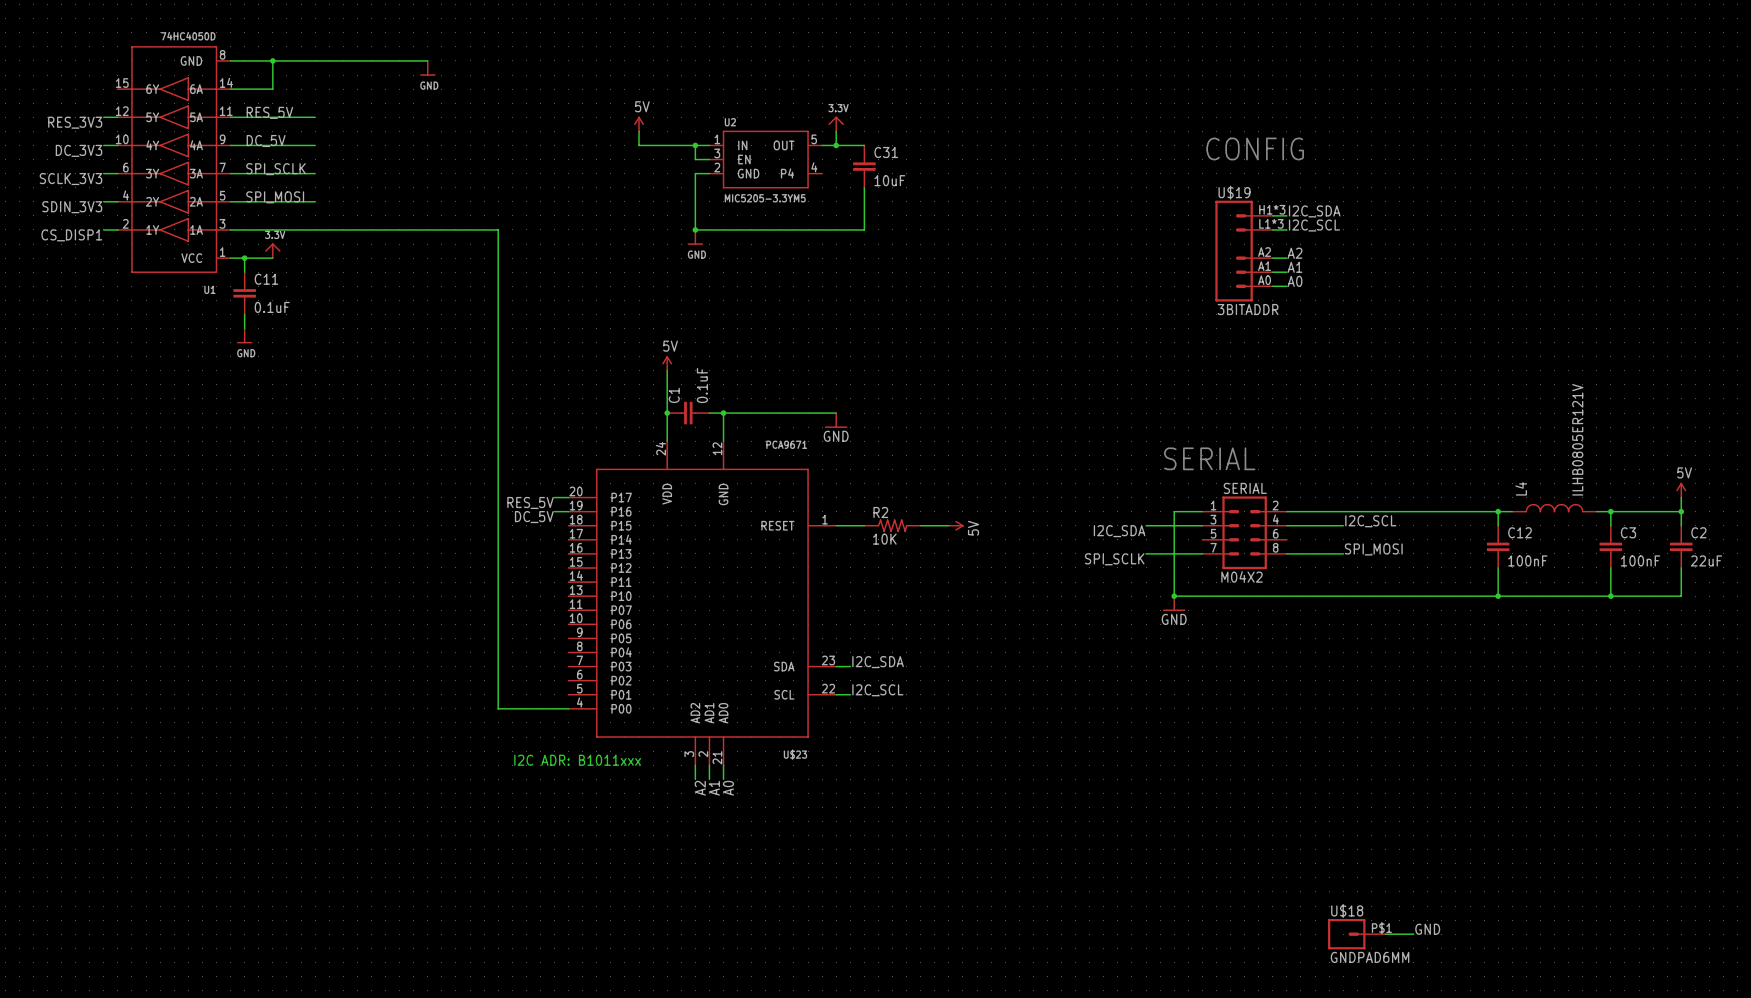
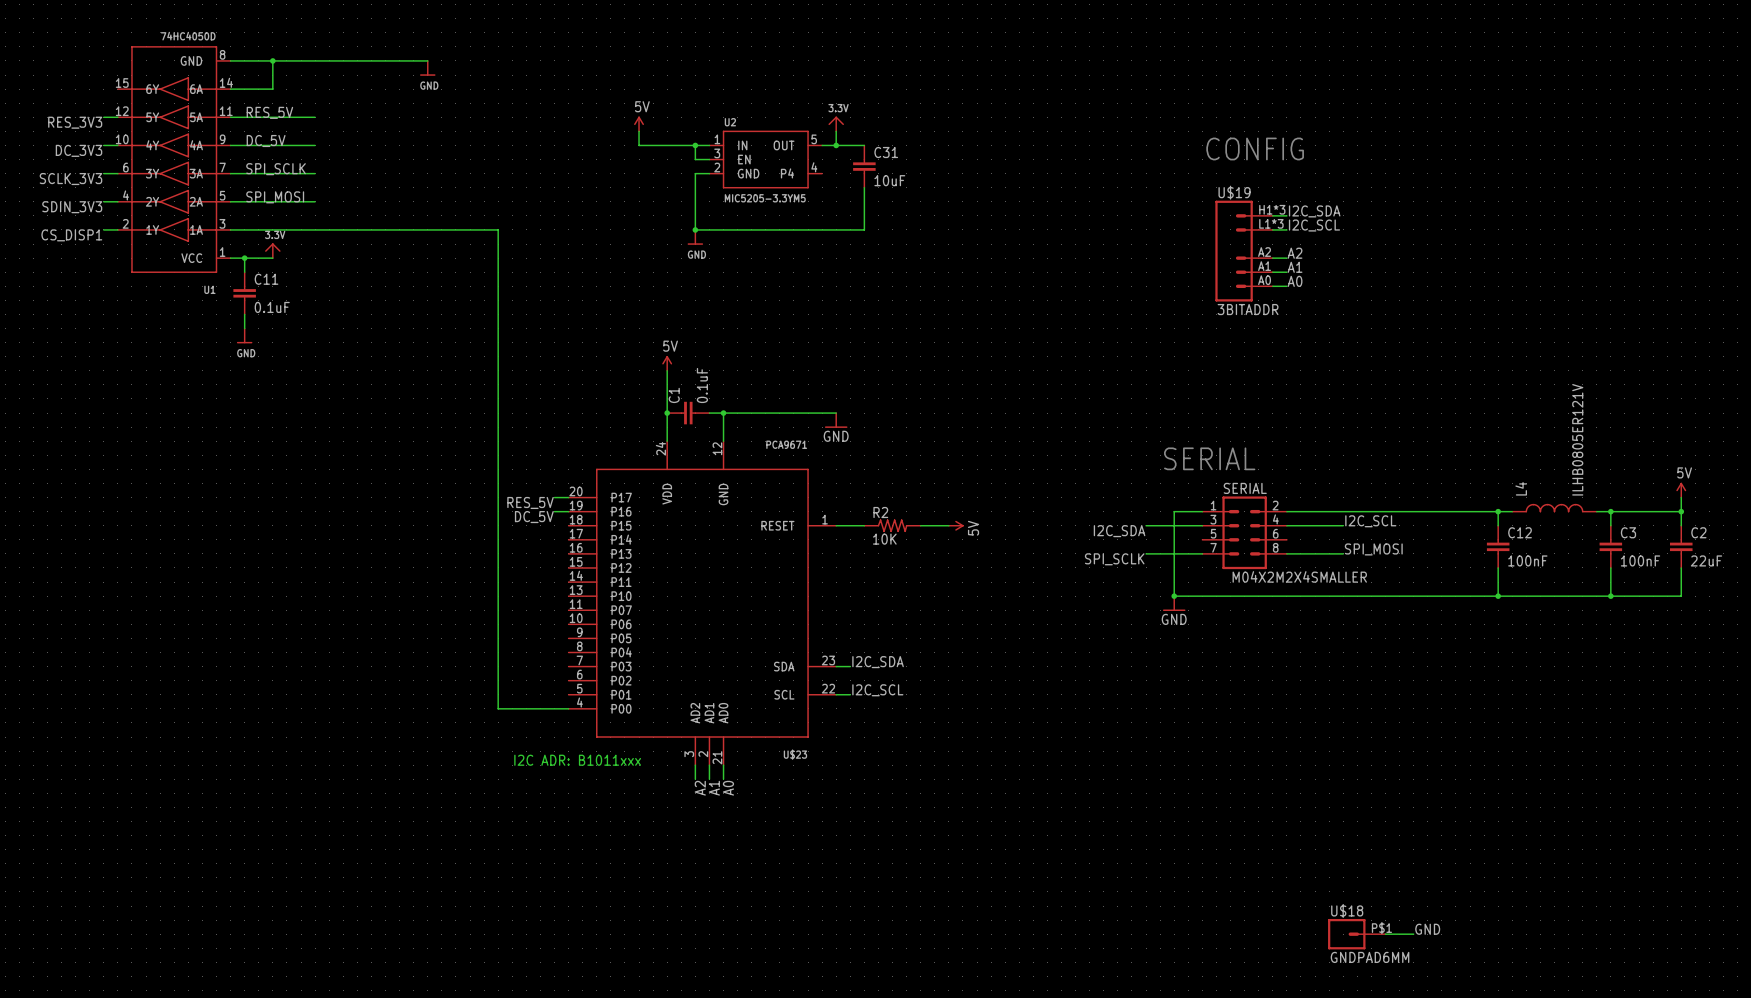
SERIAL value: M04X2 (1242, 576) -> M04X2M2X4SMALLER (1299, 576)

